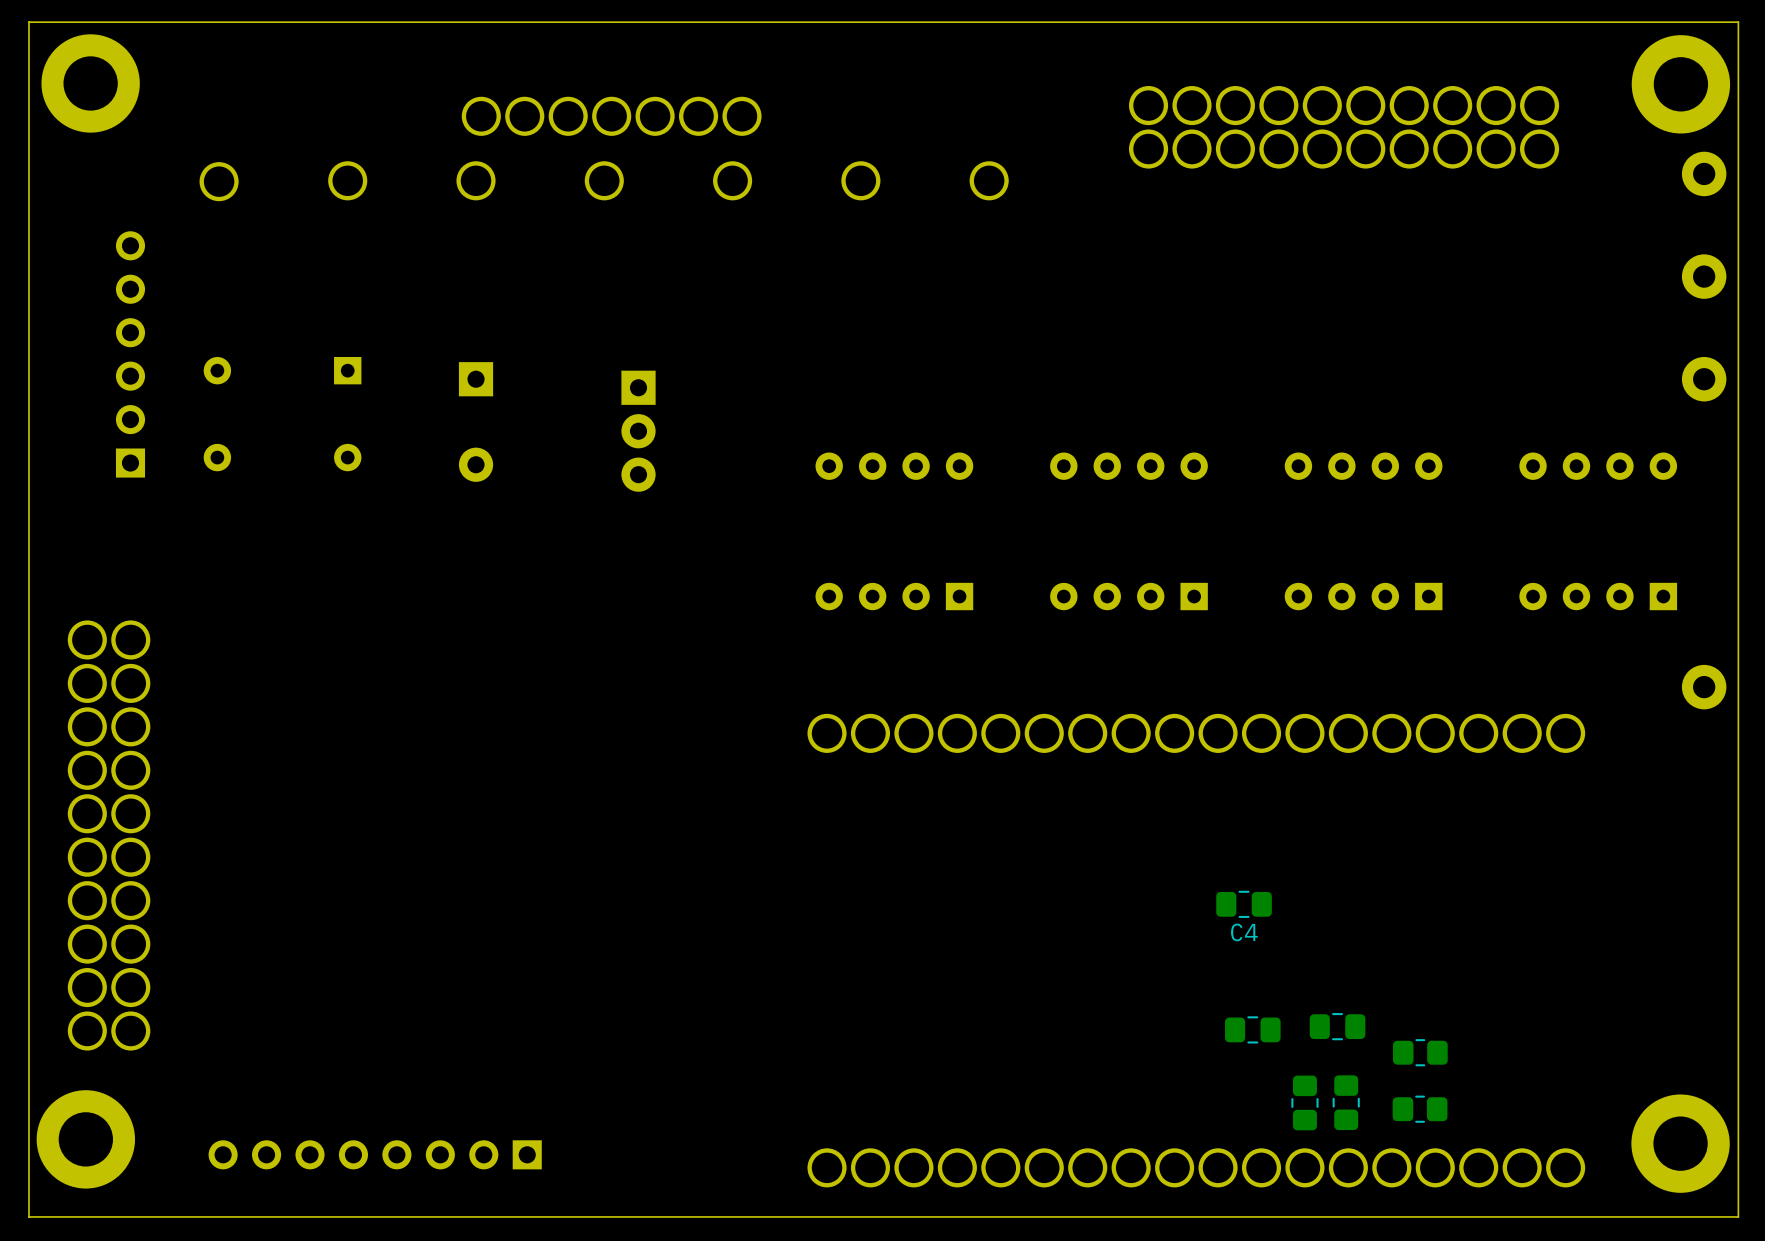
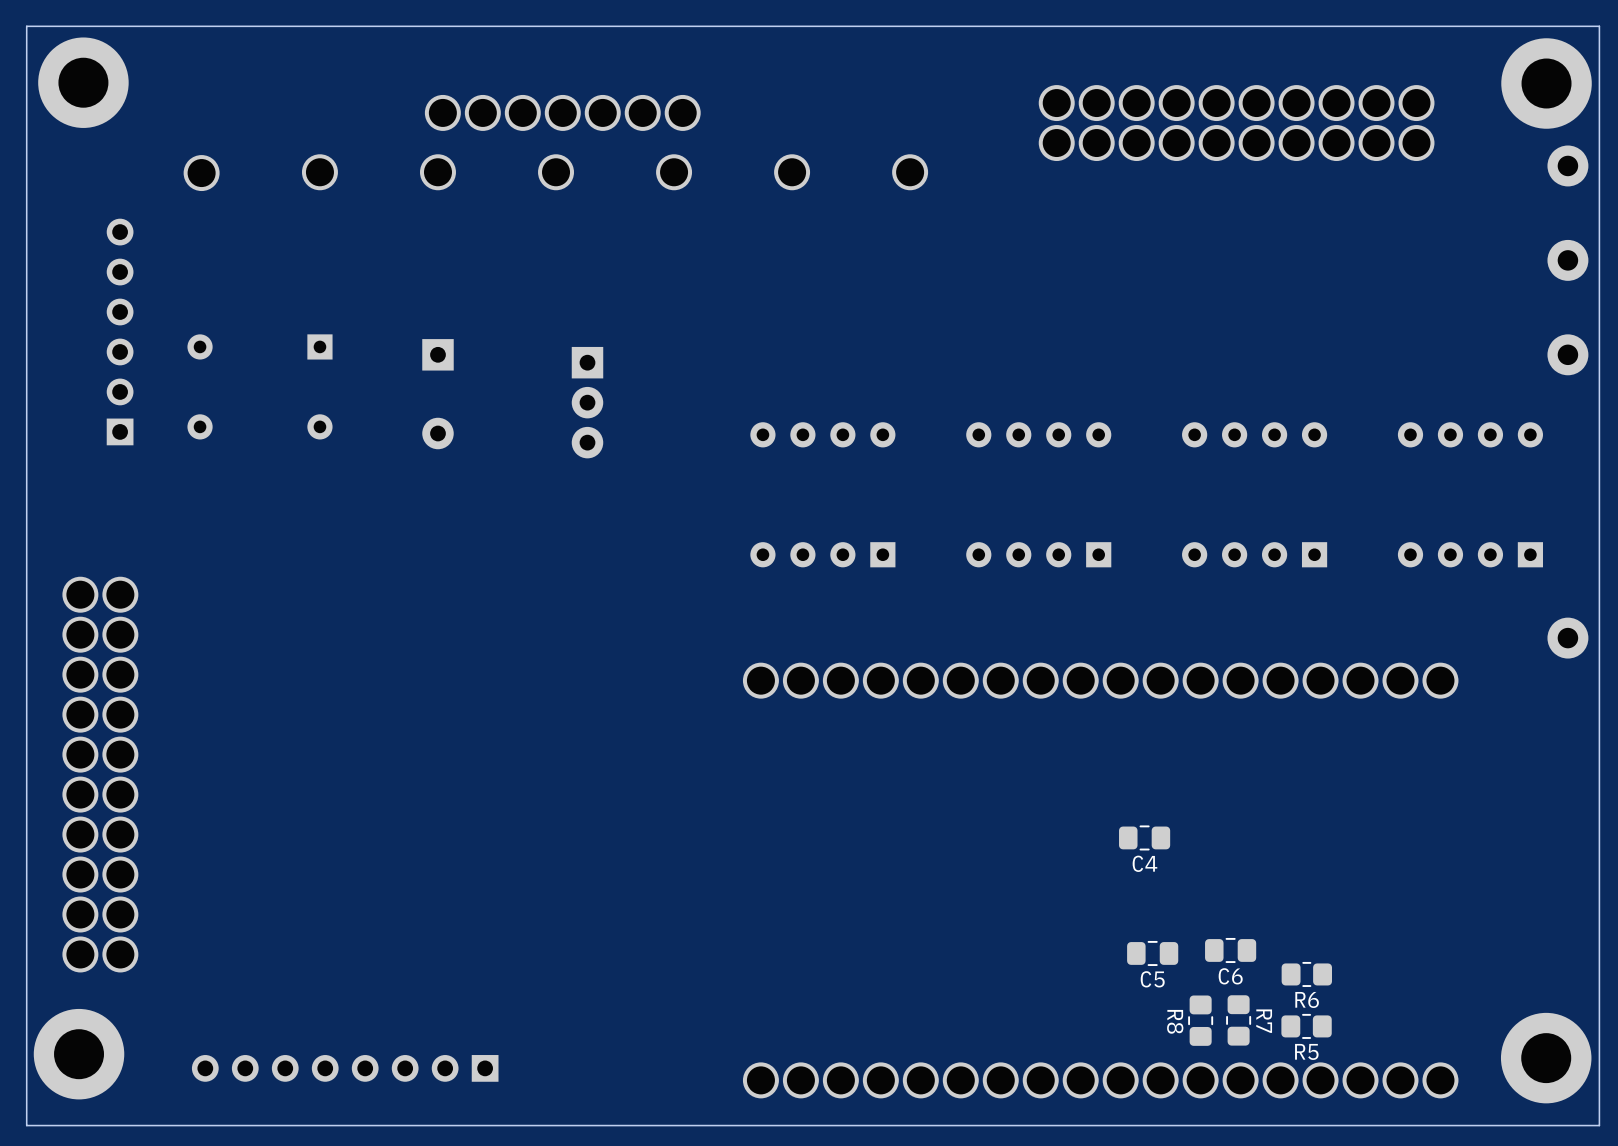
C6 name: none -> C6 (1230, 976)
C5 name: none -> C5 (1152, 979)
R6 name: none -> R6 (1307, 999)
R7 name: none -> R7 (1264, 1021)
R8 name: none -> R8 (1175, 1021)
R5 name: none -> R5 (1306, 1051)

